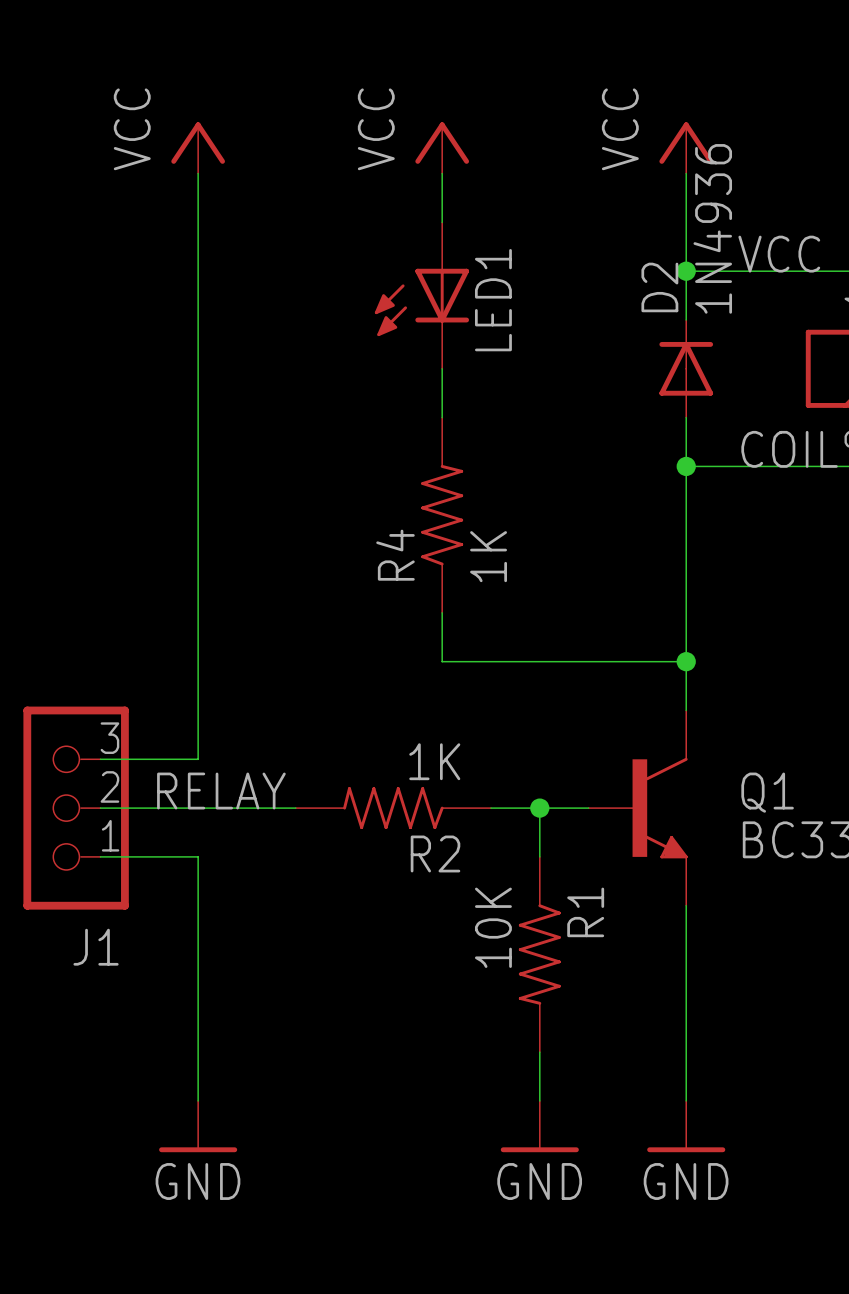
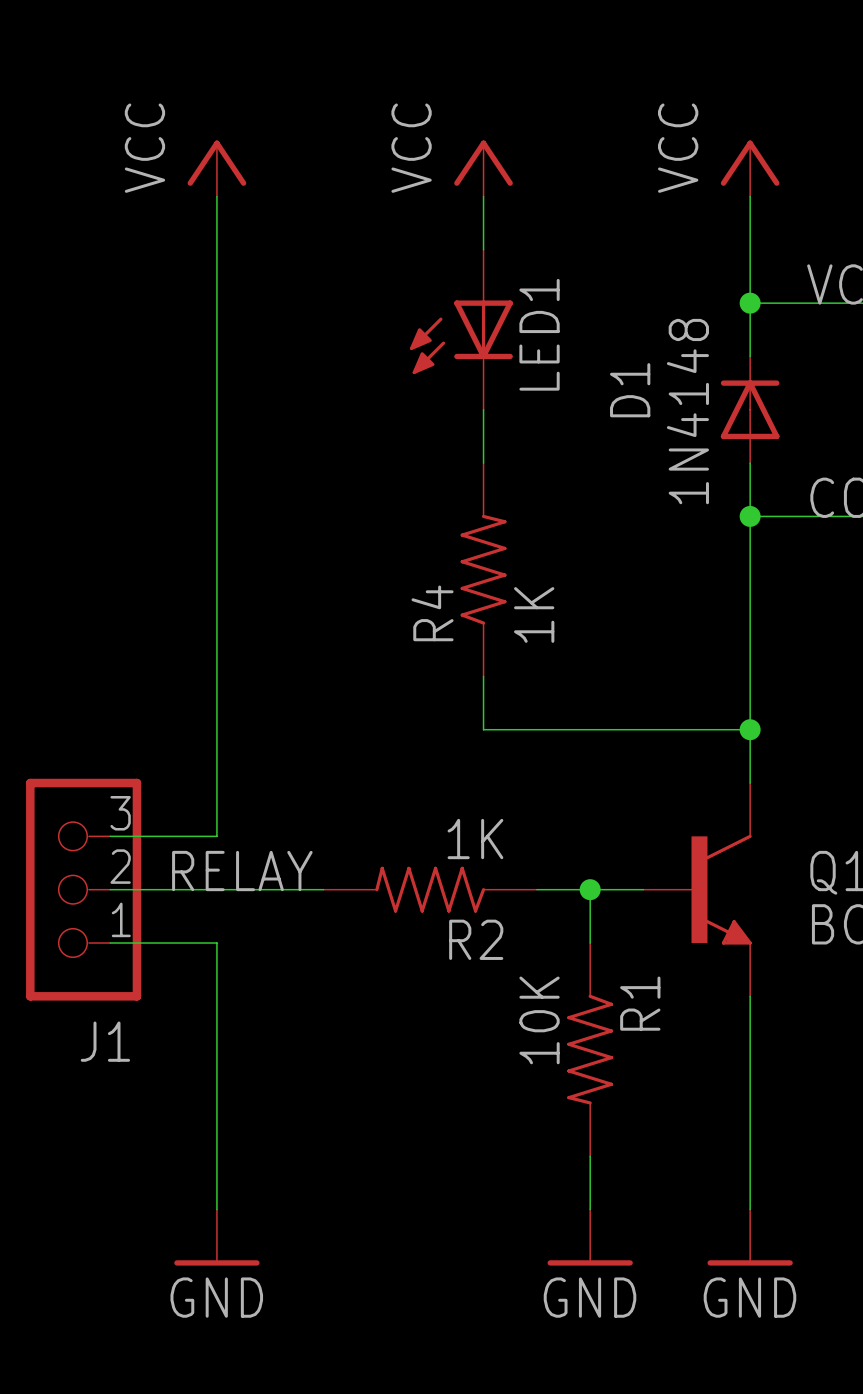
D2 value: 1N4936 (712, 228) -> 1N4148 (687, 411)
D2 name: D2 (659, 287) -> D1 (630, 390)

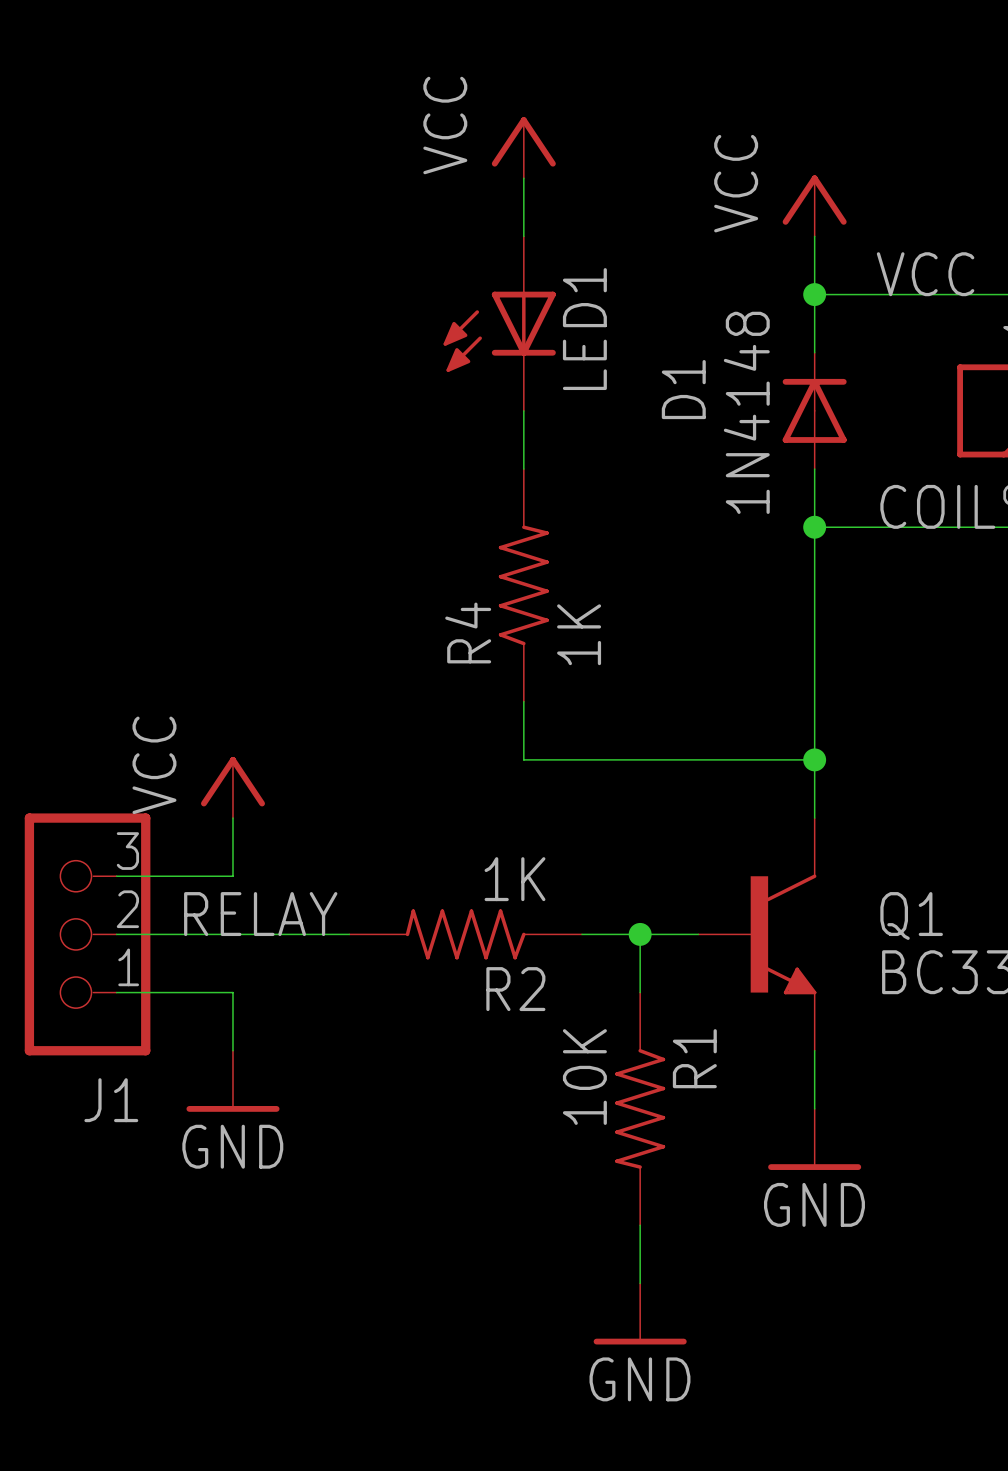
power symbol: VCC (216, 168) -> none
power symbol position: VCC (750, 168) -> VCC (814, 205)
wire: (216, 196) (216, 783) -> none
power symbol: none -> VCC (232, 787)
wire: (216, 996) (216, 1209) -> none
wire: (750, 1049) (750, 1209) -> none
power symbol position: GND (216, 1237) -> GND (232, 1081)
power symbol position: GND (750, 1237) -> GND (814, 1139)

